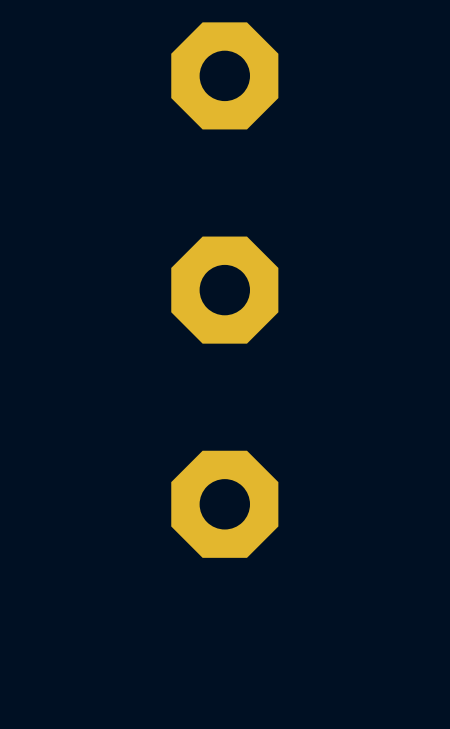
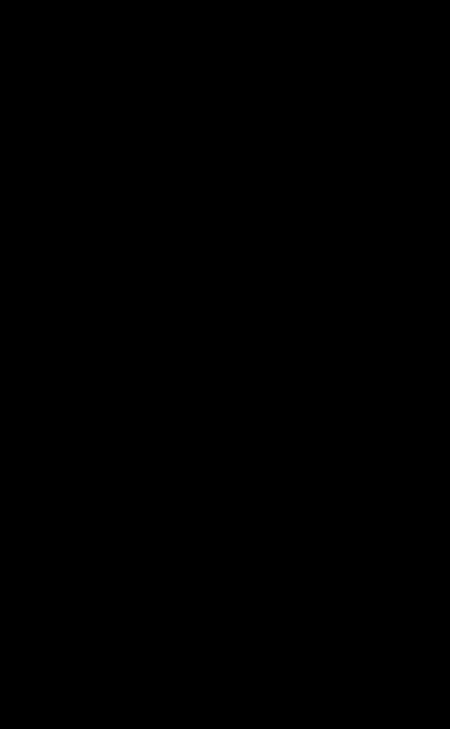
part: (224, 75) -> none
part: (224, 290) -> none
part: (224, 504) -> none

